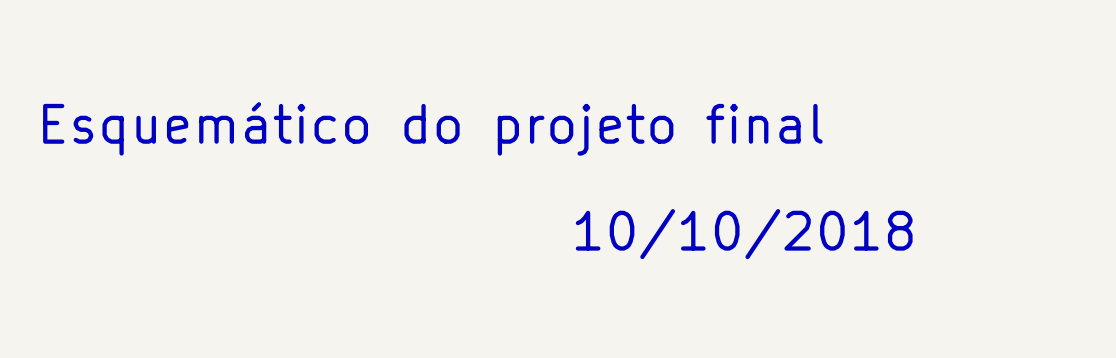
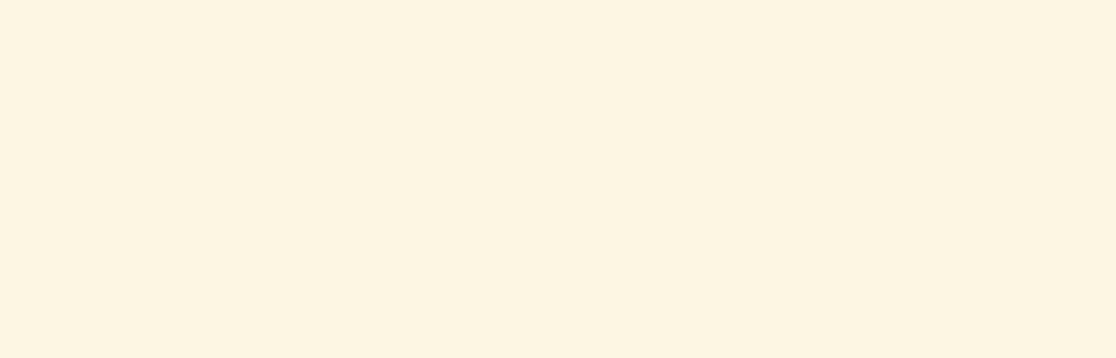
text: Esquemático do projeto final (432, 128) -> none
text: 10/10/2018 (744, 234) -> none

